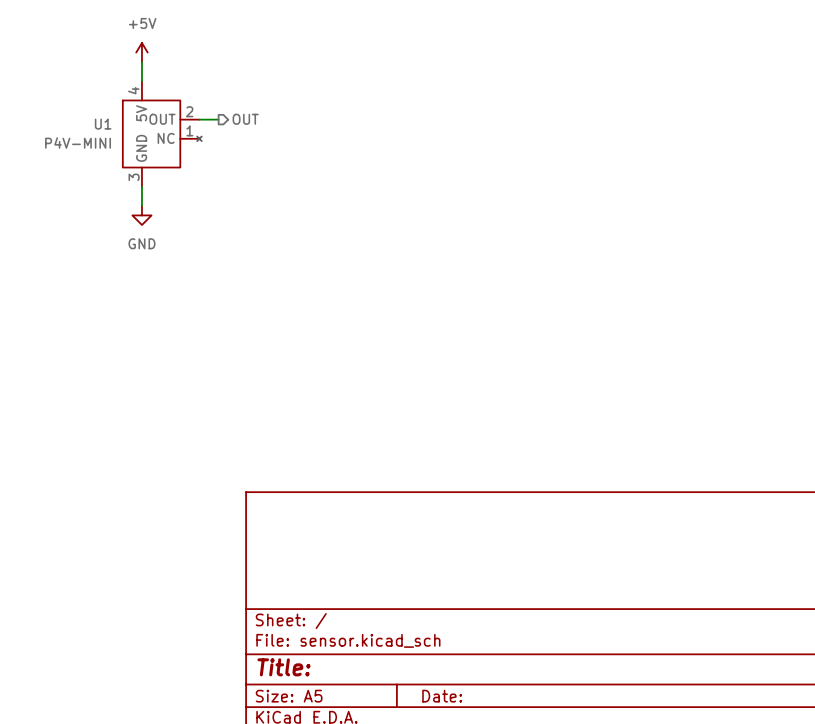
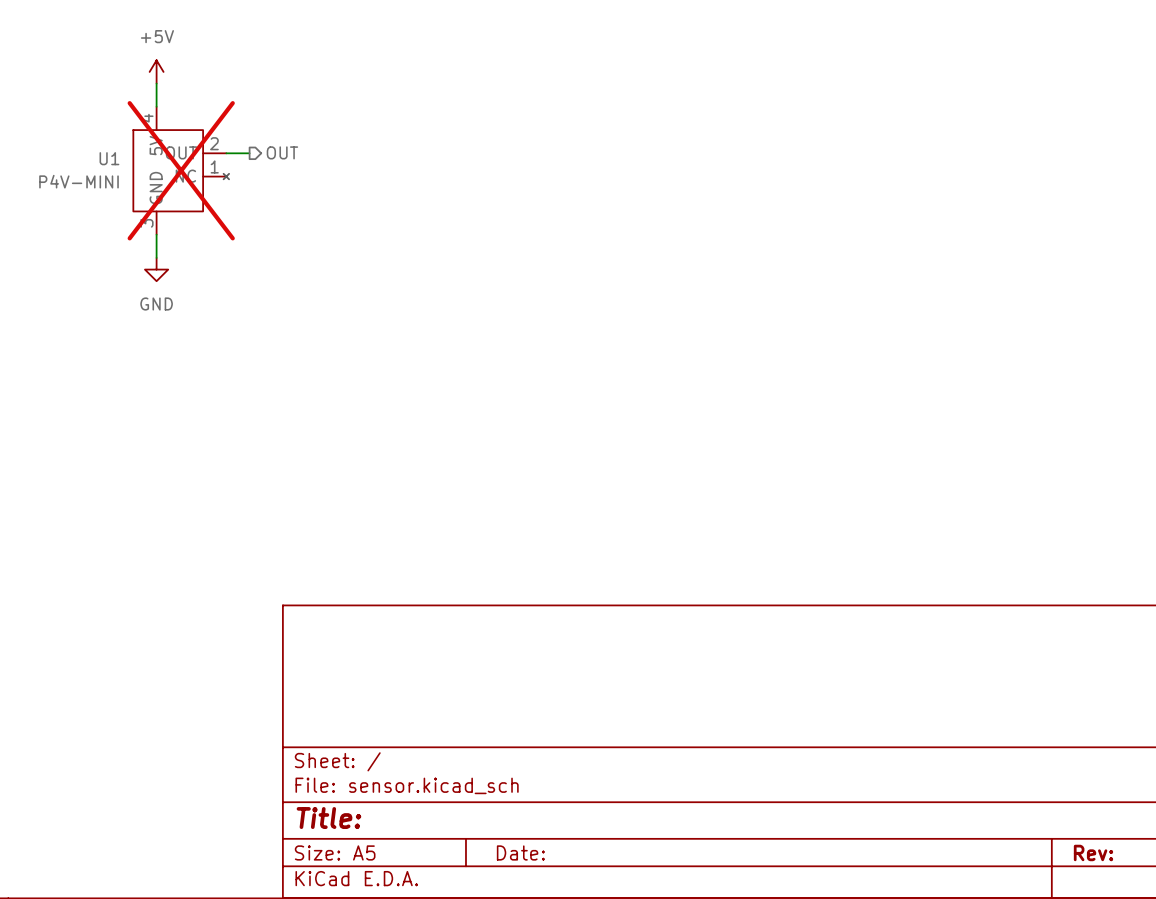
U1 do-not-place cross: none -> (181, 170)

